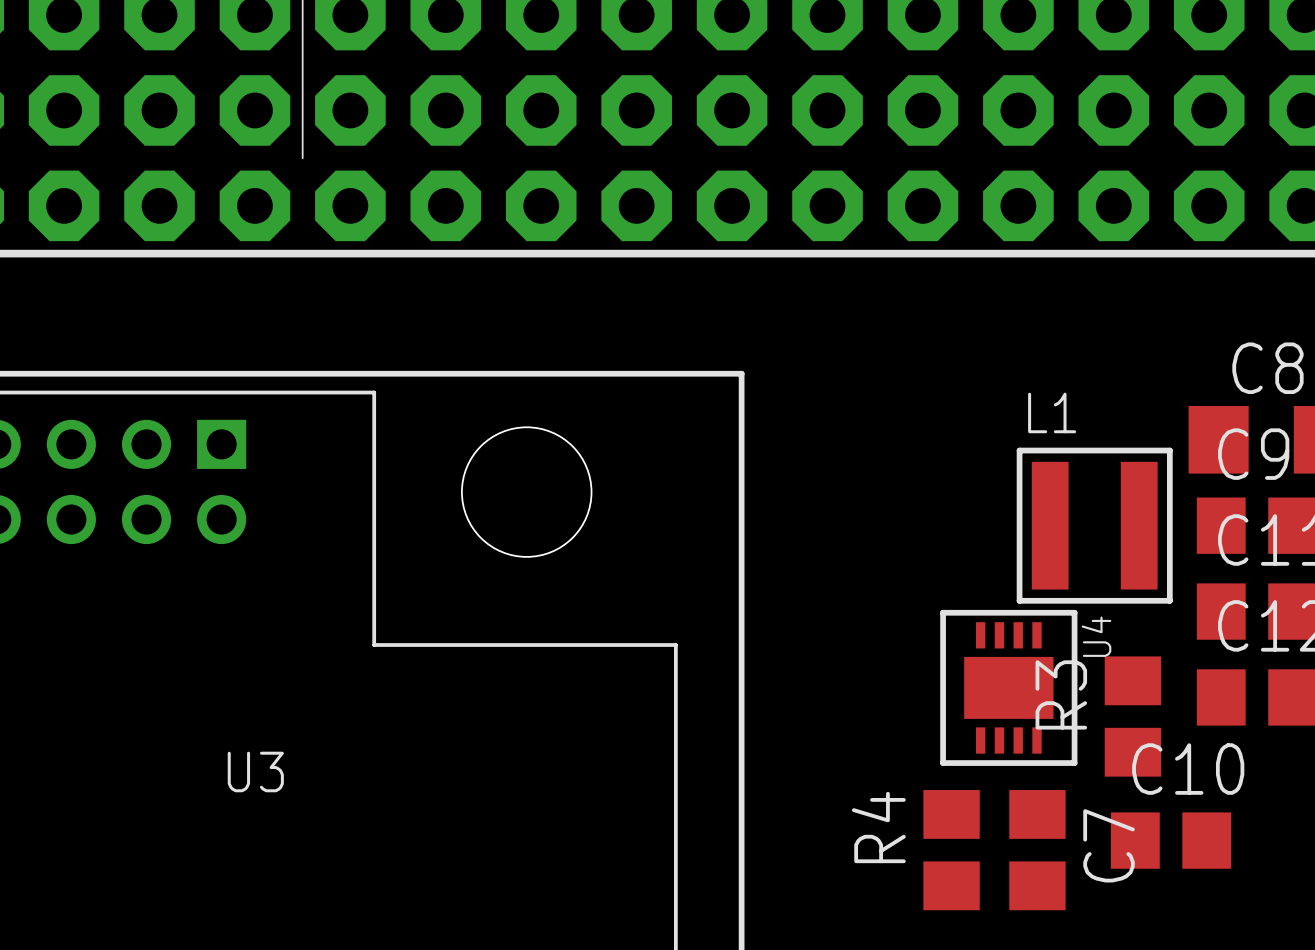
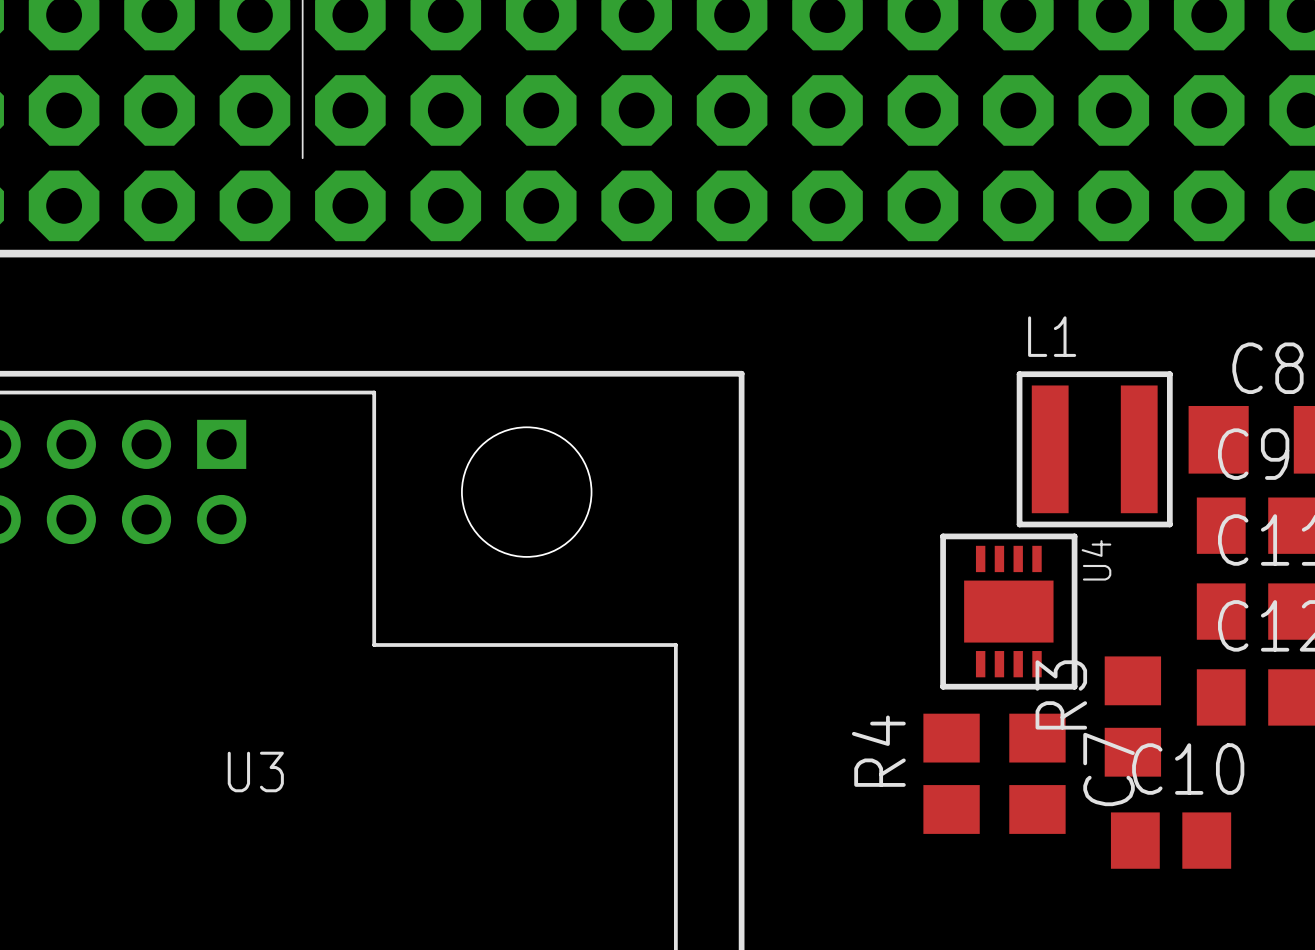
L1 position: (1094, 525) -> (1094, 449)
U4 position: (1008, 687) -> (1008, 611)
R4 position: (951, 850) -> (951, 773)
C7 position: (1037, 850) -> (1037, 773)

